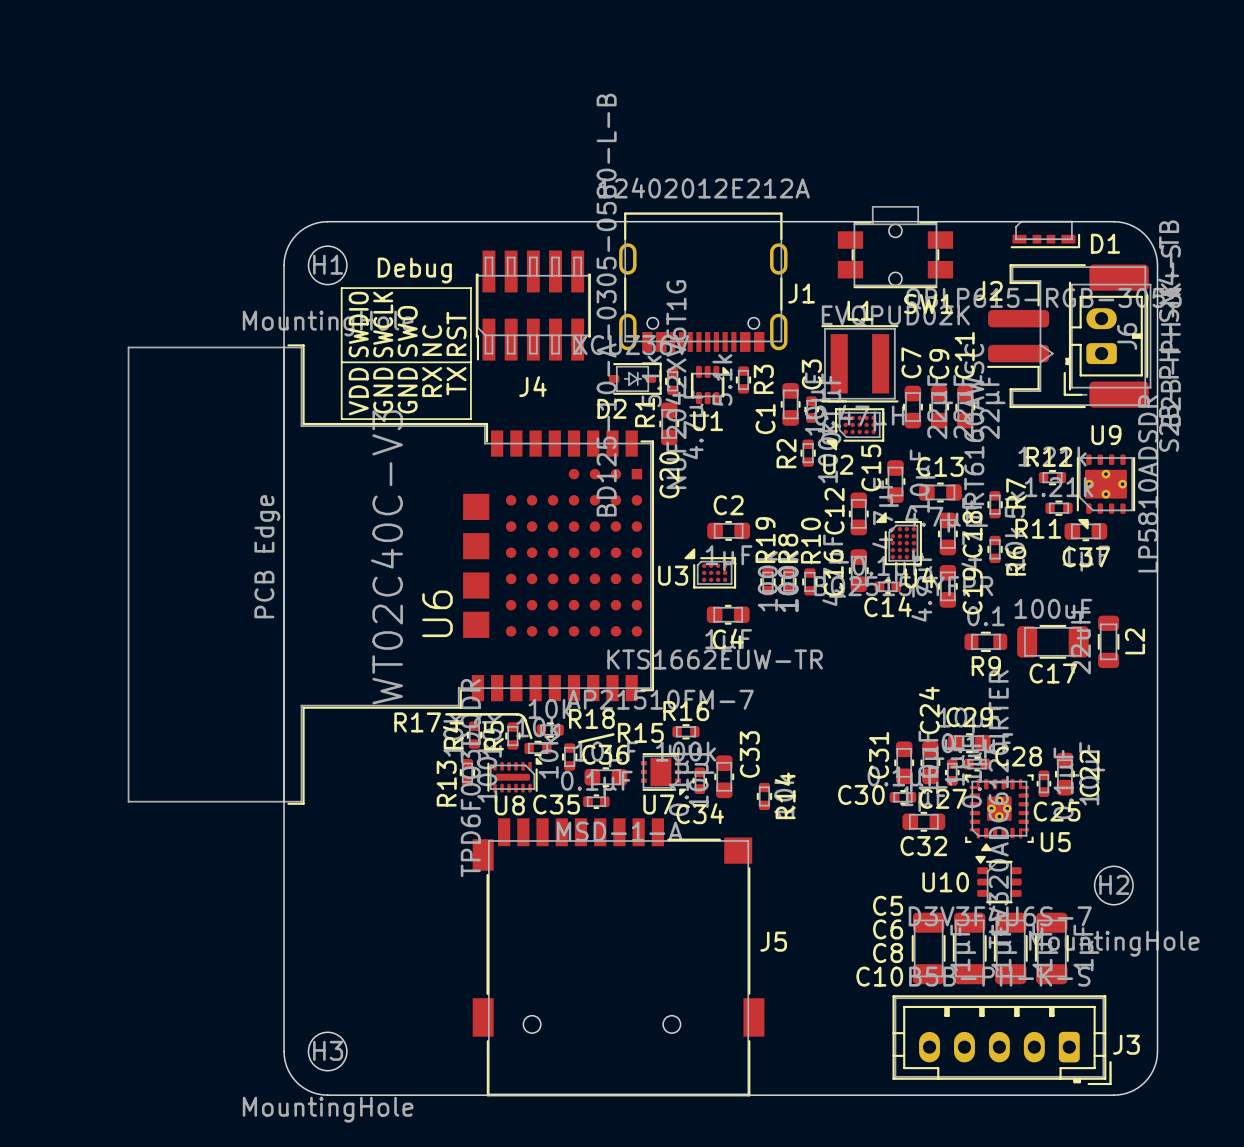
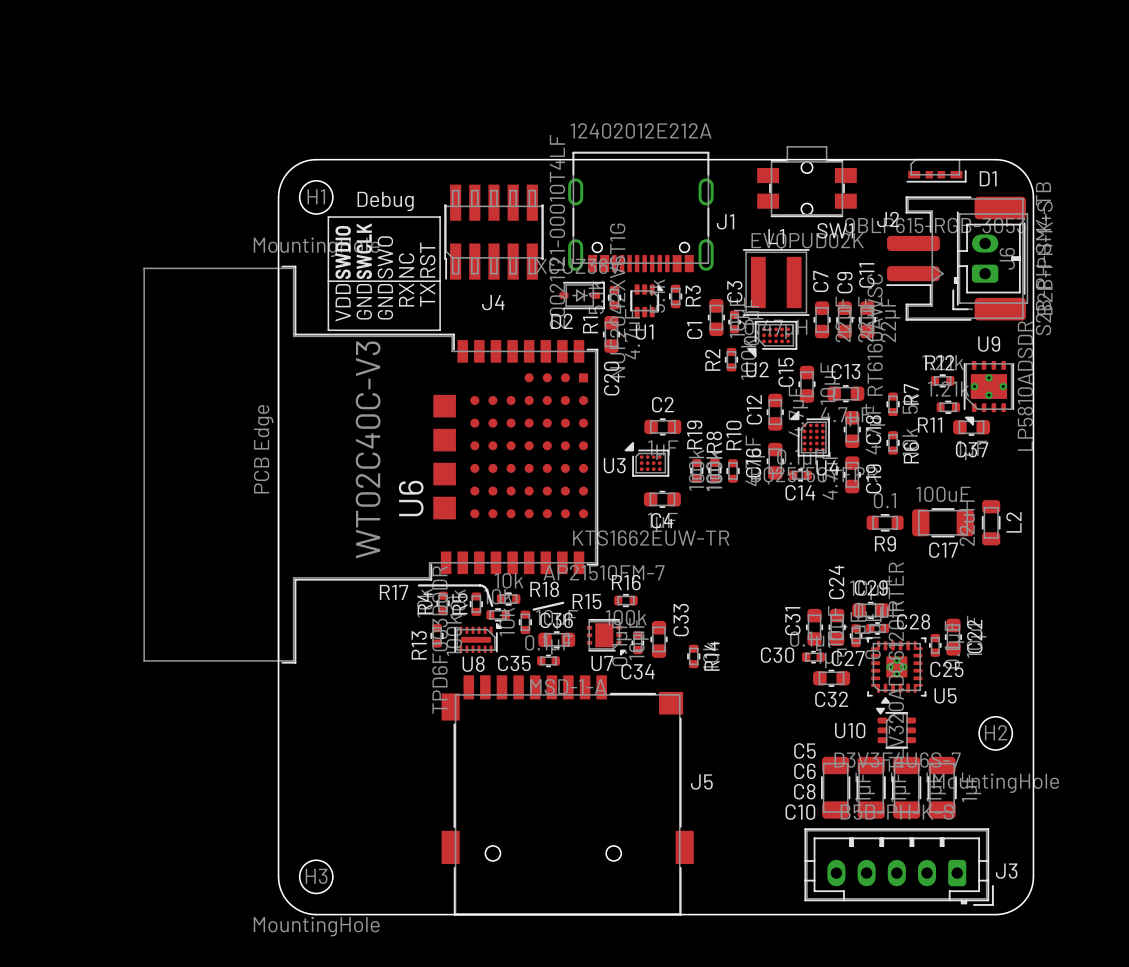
J4 value: BD125-10-A-0305-0580-L-B (606, 305) -> 20021121-00010T4LF (557, 231)

